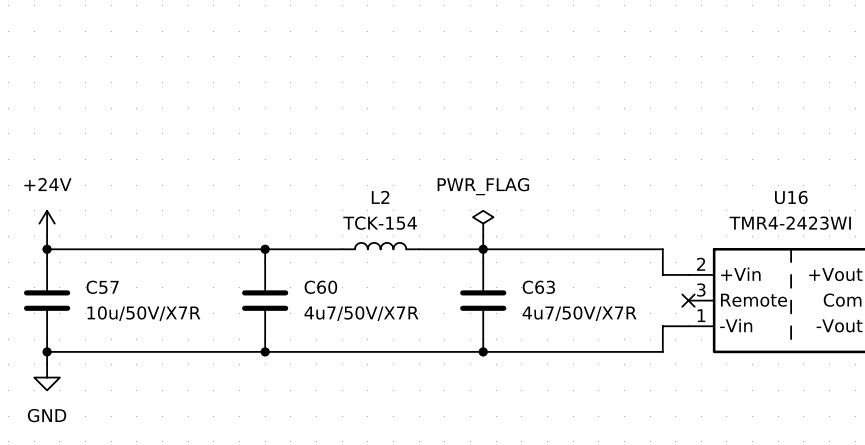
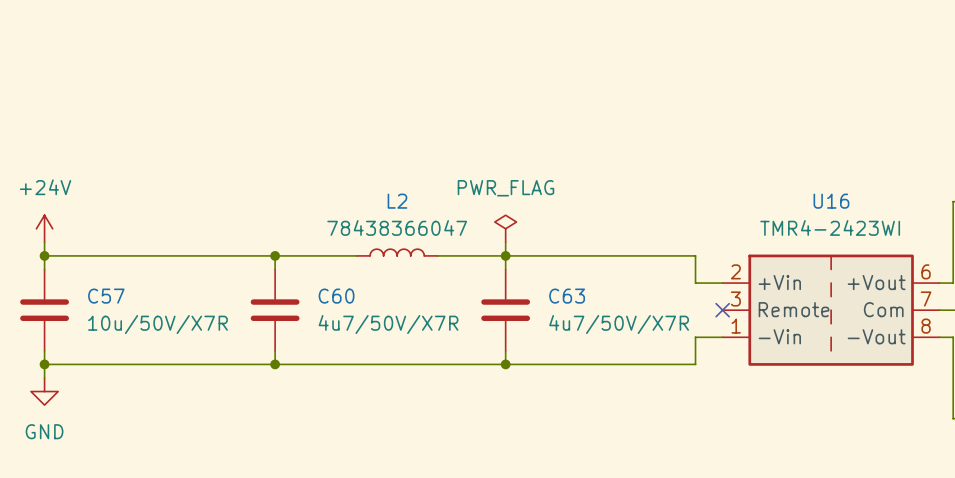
L2 value: TCK-154 (380, 223) -> 78438366047 (397, 227)

